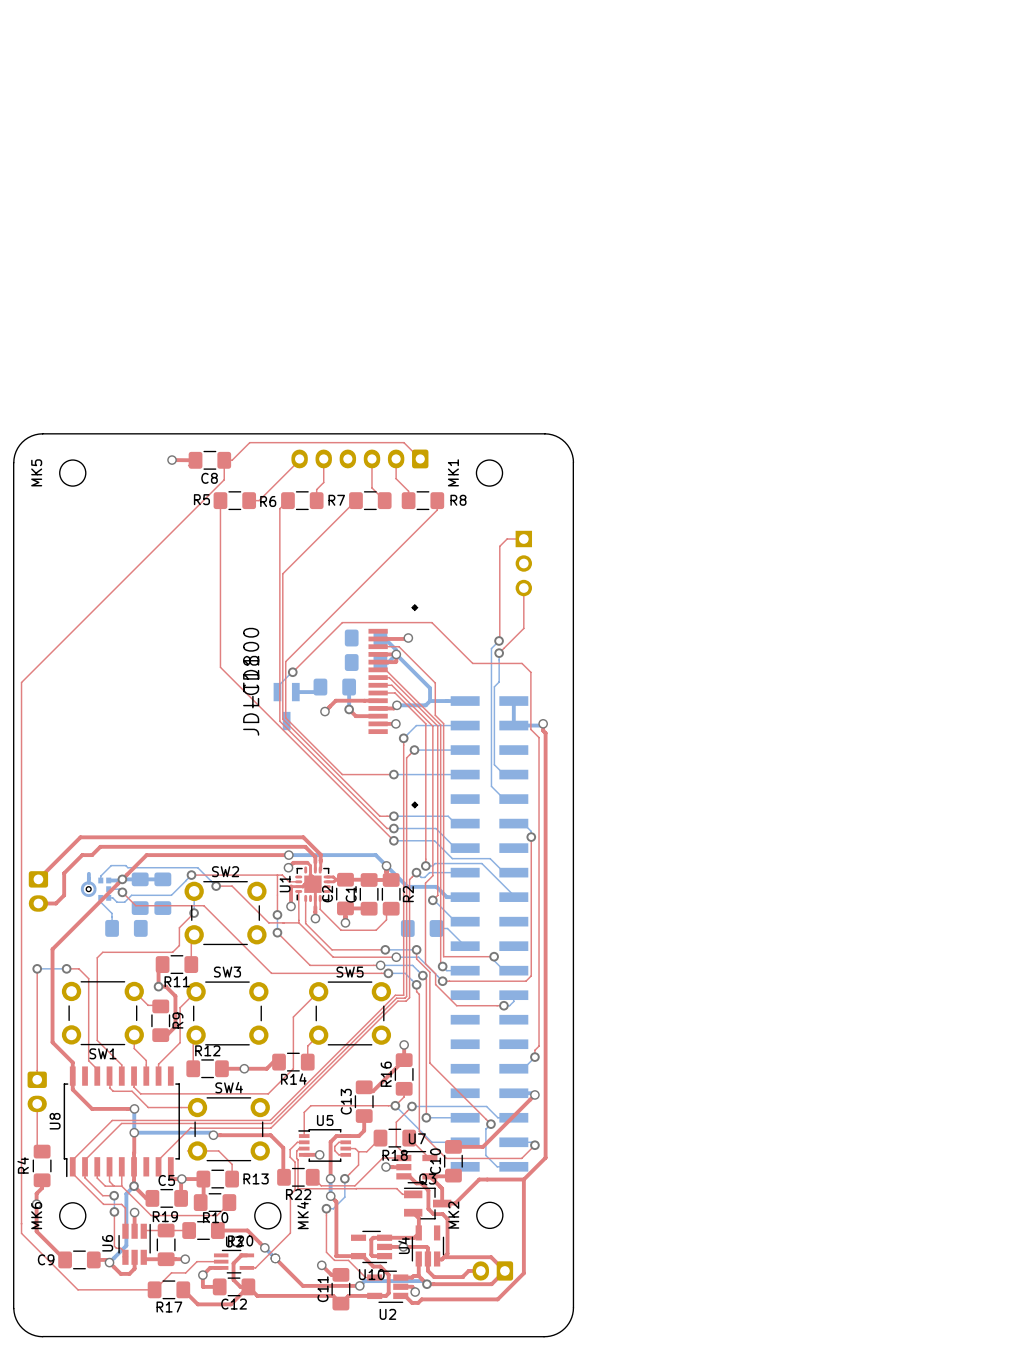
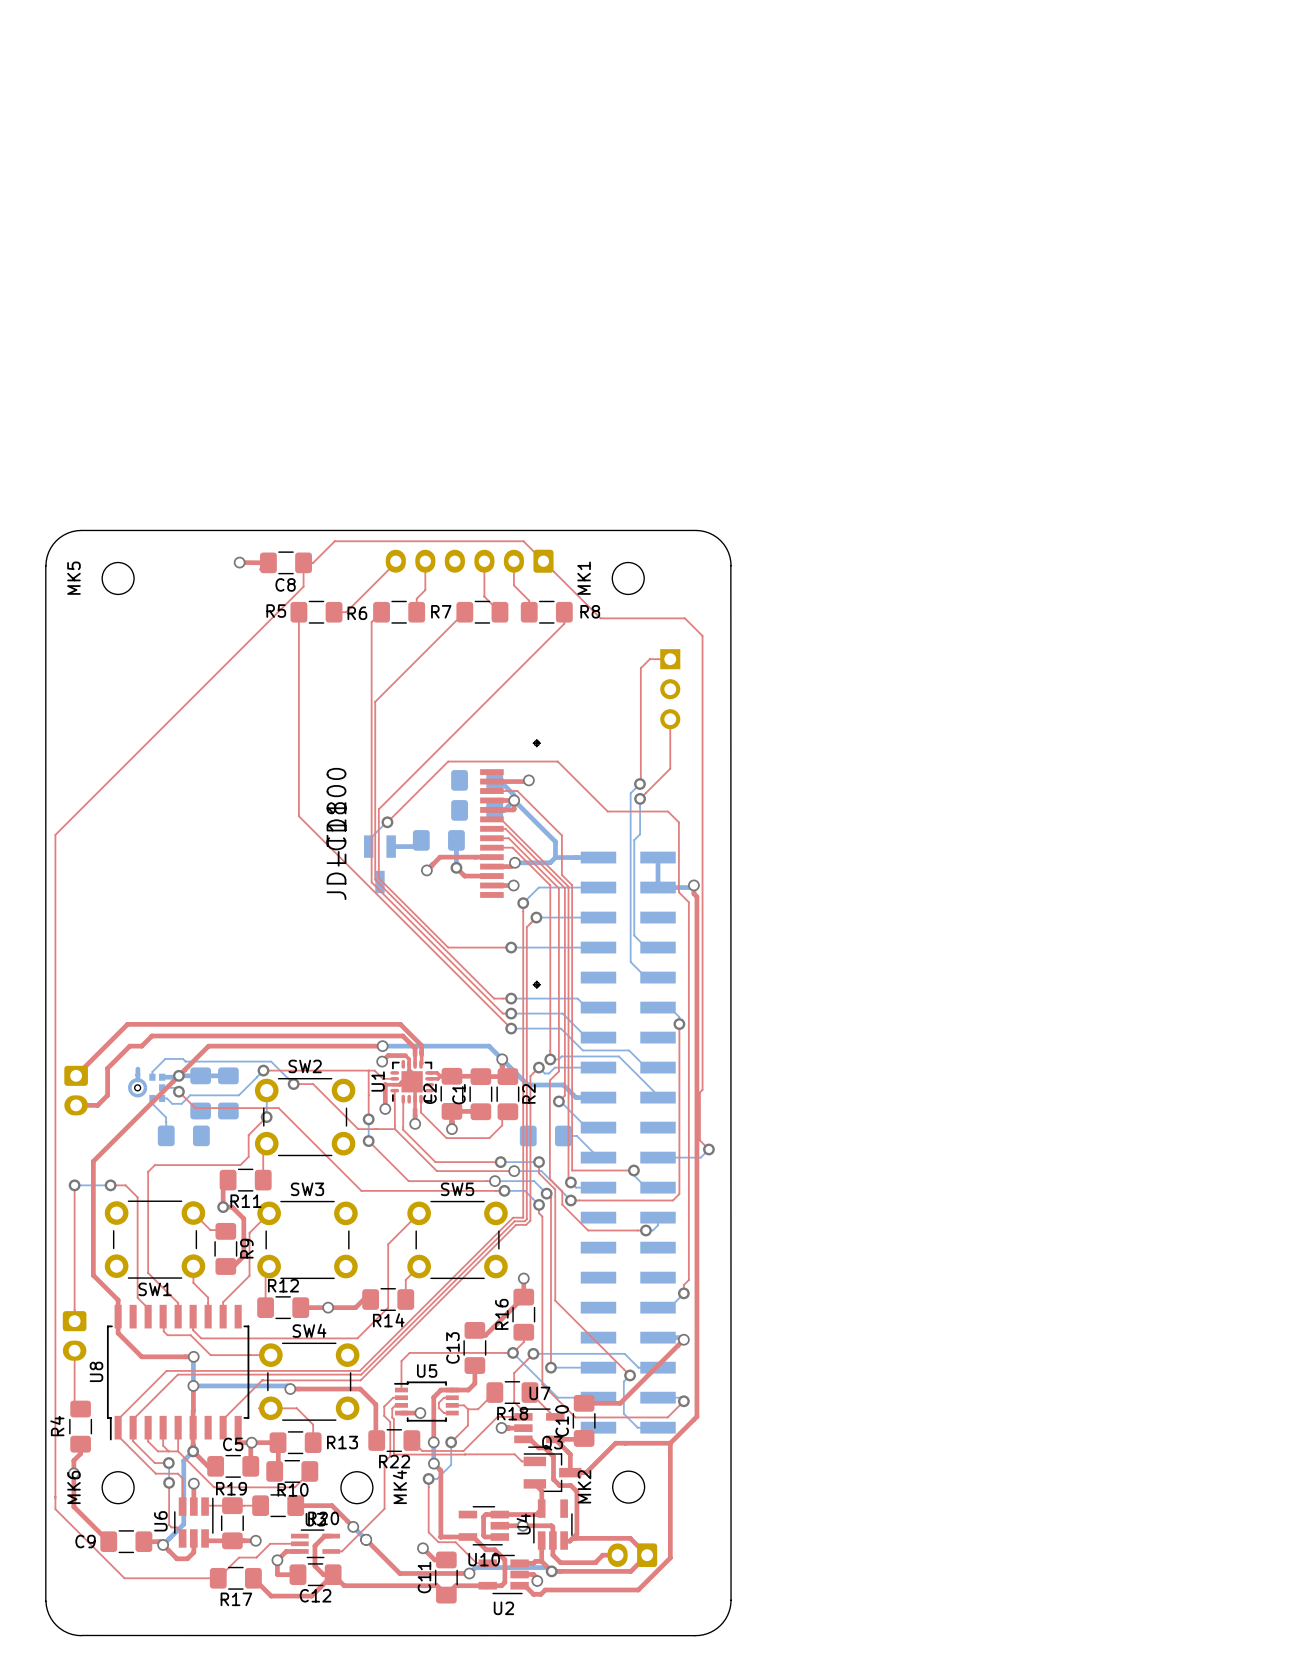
top track: none -> (543, 561) (600, 618) (684, 618) (702, 635) (702, 1089) (699, 1092) (699, 1140) (708, 1149)
bottom track: none -> (708, 1149) (700, 1157) (658, 1157)
via: none -> (708, 1149)

